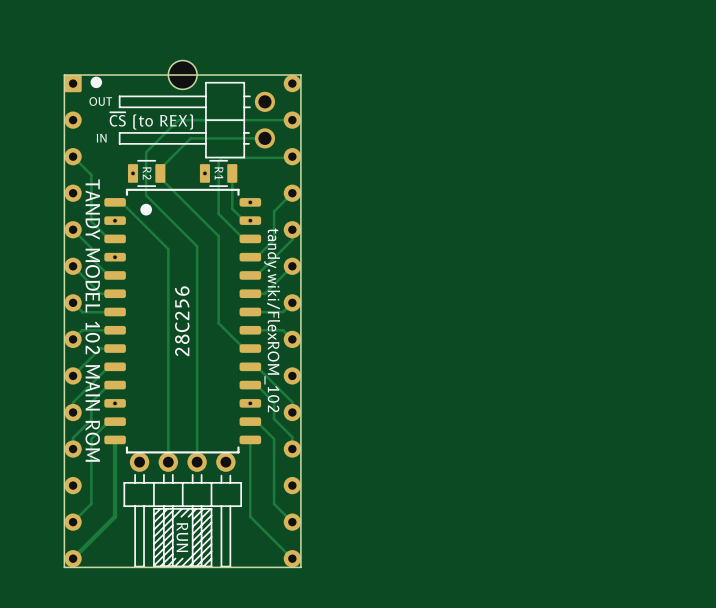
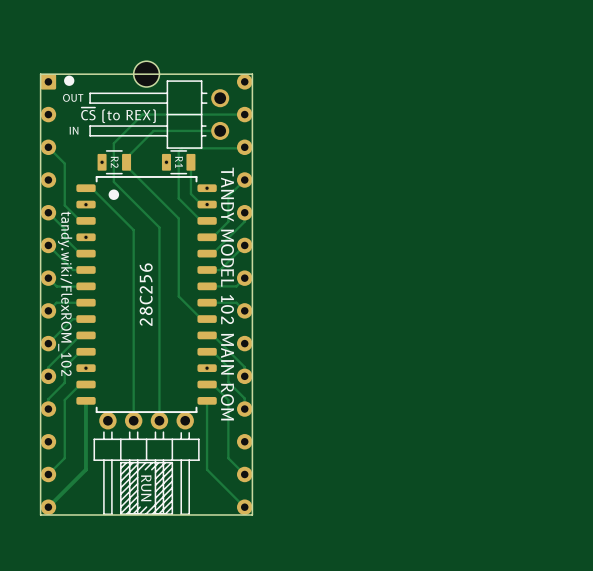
text: TANDY MODEL 102 MAIN ROM (92, 320) -> tandy.wiki/FlexROM_102 (65, 293)
text: tandy.wiki/FlexROM_102 (272, 320) -> TANDY MODEL 102 MAIN ROM (227, 294)

